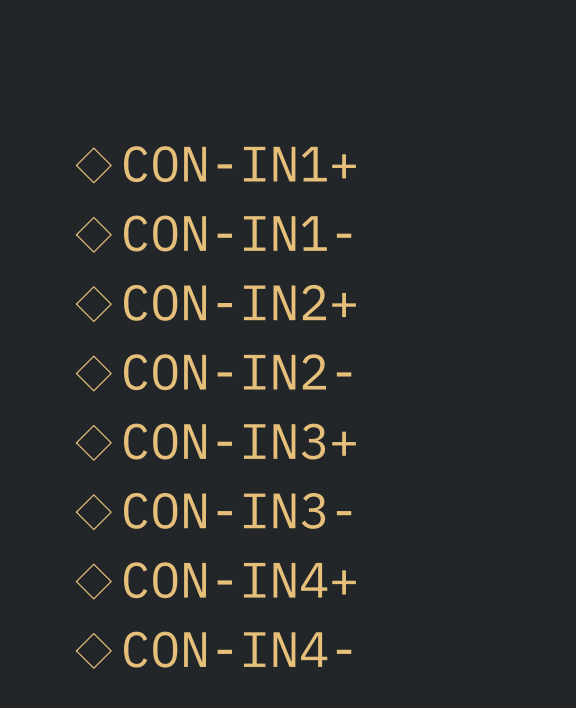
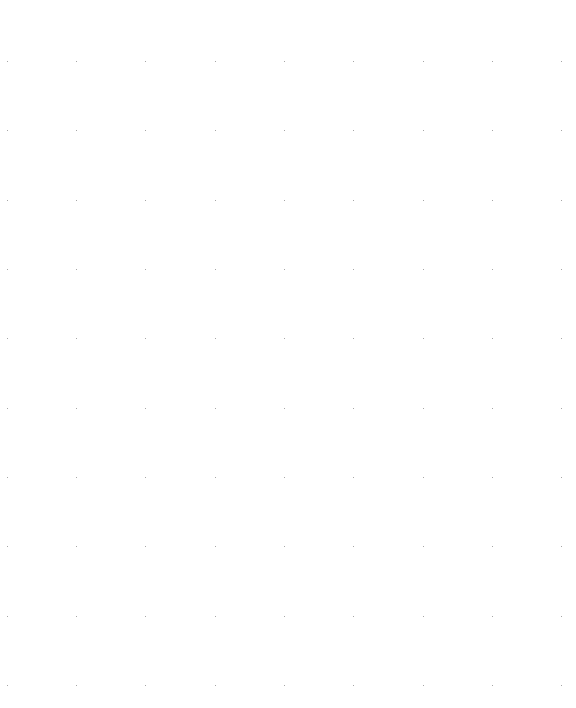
hierarchical label: CON-IN1+ (239, 164) -> none
hierarchical label: CON-IN1- (237, 233) -> none
hierarchical label: CON-IN2+ (239, 302) -> none
hierarchical label: CON-IN2- (237, 372) -> none
hierarchical label: CON-IN3+ (239, 441) -> none
hierarchical label: CON-IN3- (237, 510) -> none
hierarchical label: CON-IN4+ (239, 580) -> none
hierarchical label: CON-IN4- (237, 649) -> none

